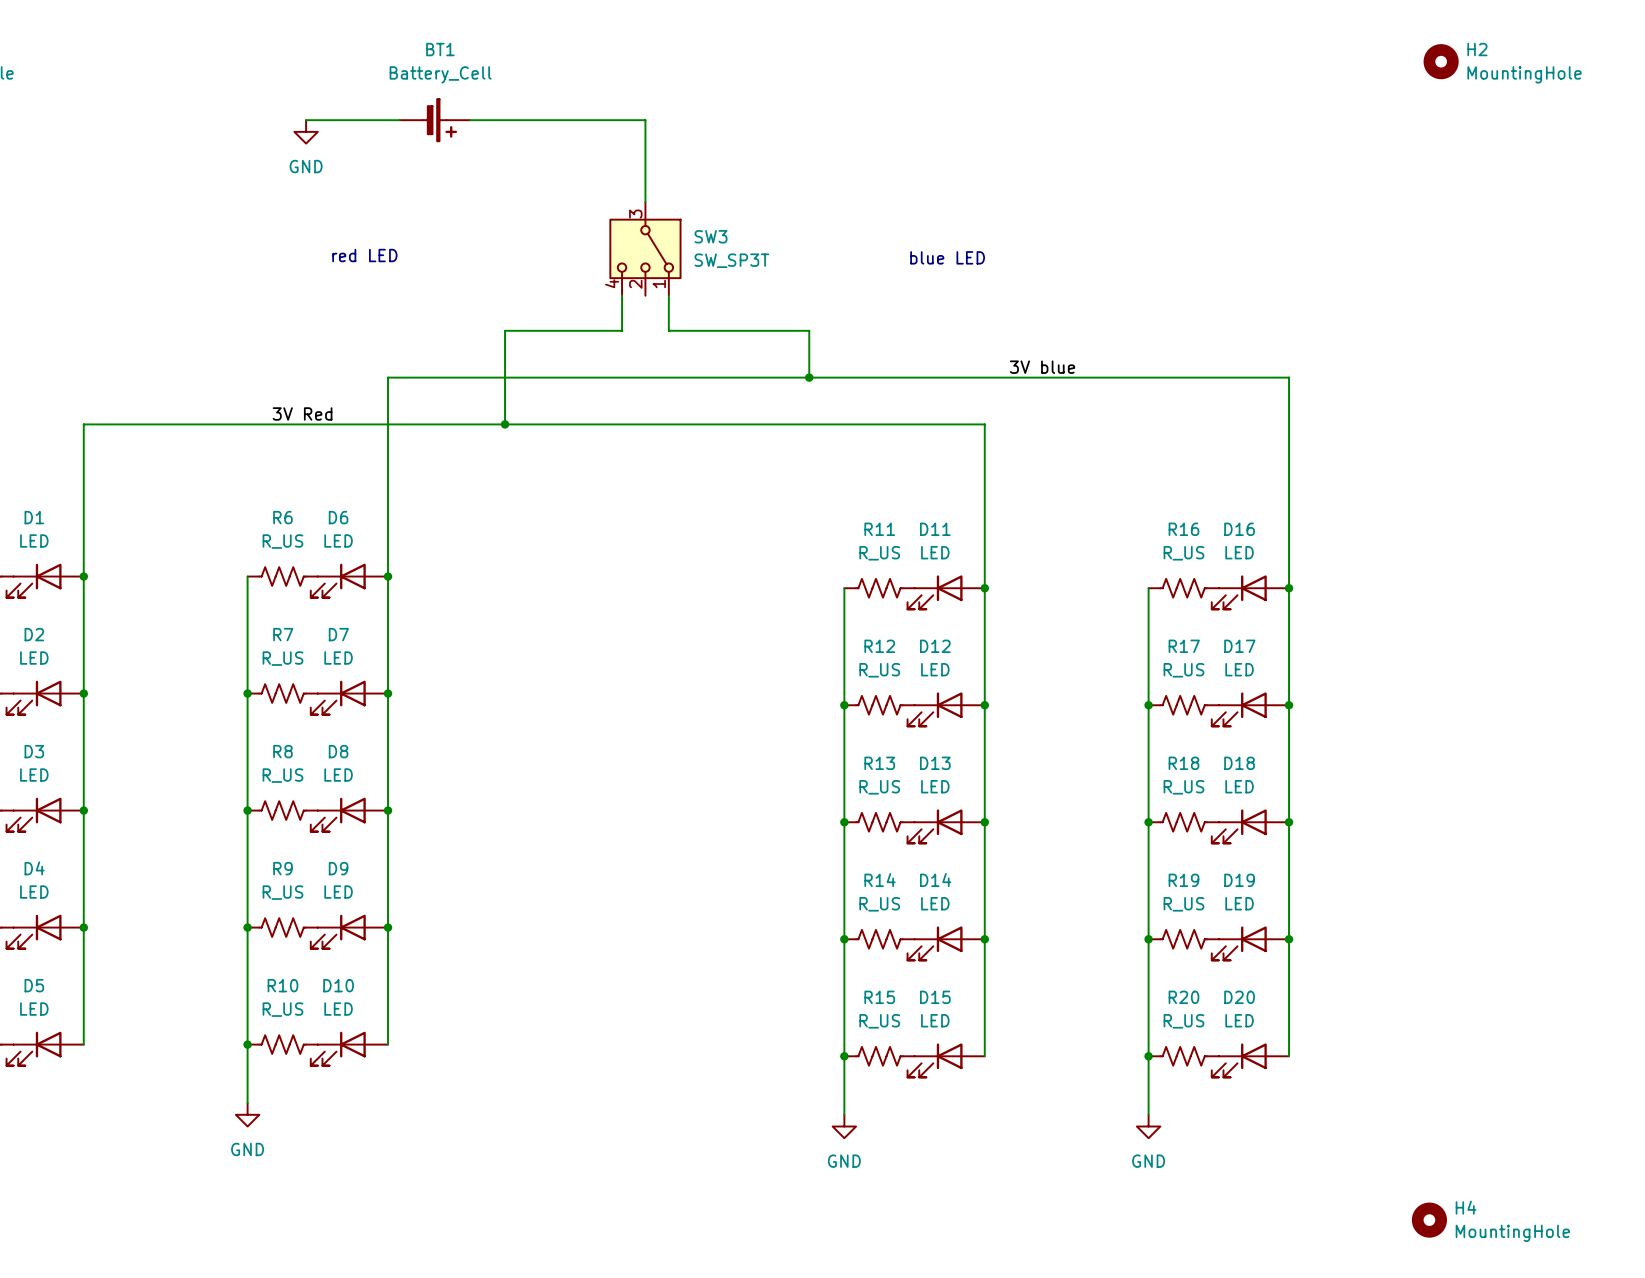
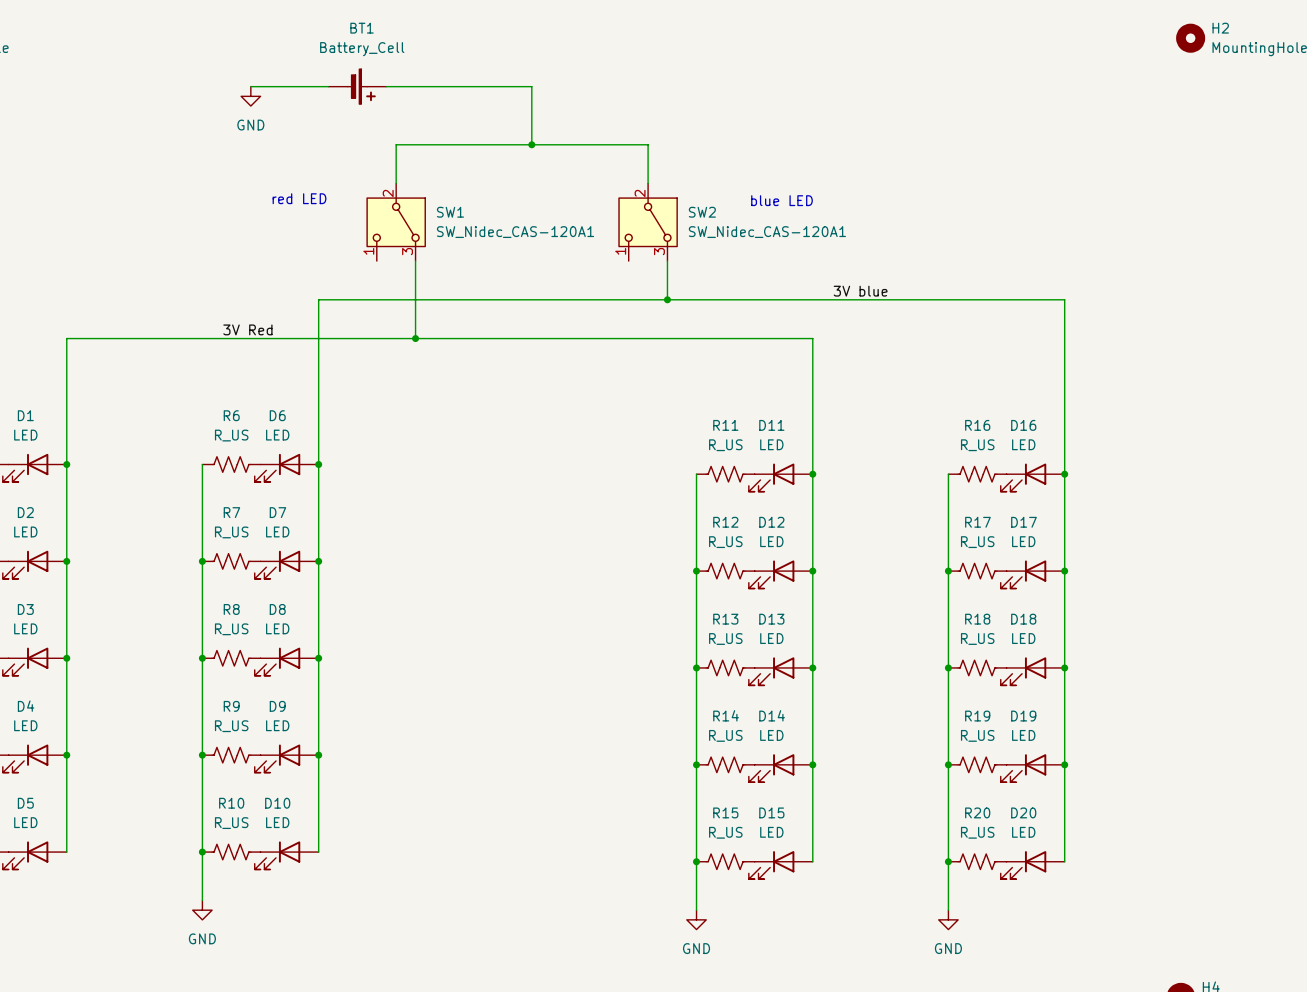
wire: (645, 190) (645, 202) -> none
junction: none -> (531, 144)
wire: none -> (396, 183) (396, 144) (648, 144) (648, 183)
SW3: SW_SP3T (645, 248) -> none
SW1: none -> SW_Nidec_CAS-120A1 (396, 222)
SW2: none -> SW_Nidec_CAS-120A1 (648, 222)
wire: (622, 295) (622, 330) (505, 330) -> none
wire: (668, 295) (668, 330) (809, 330) -> none

